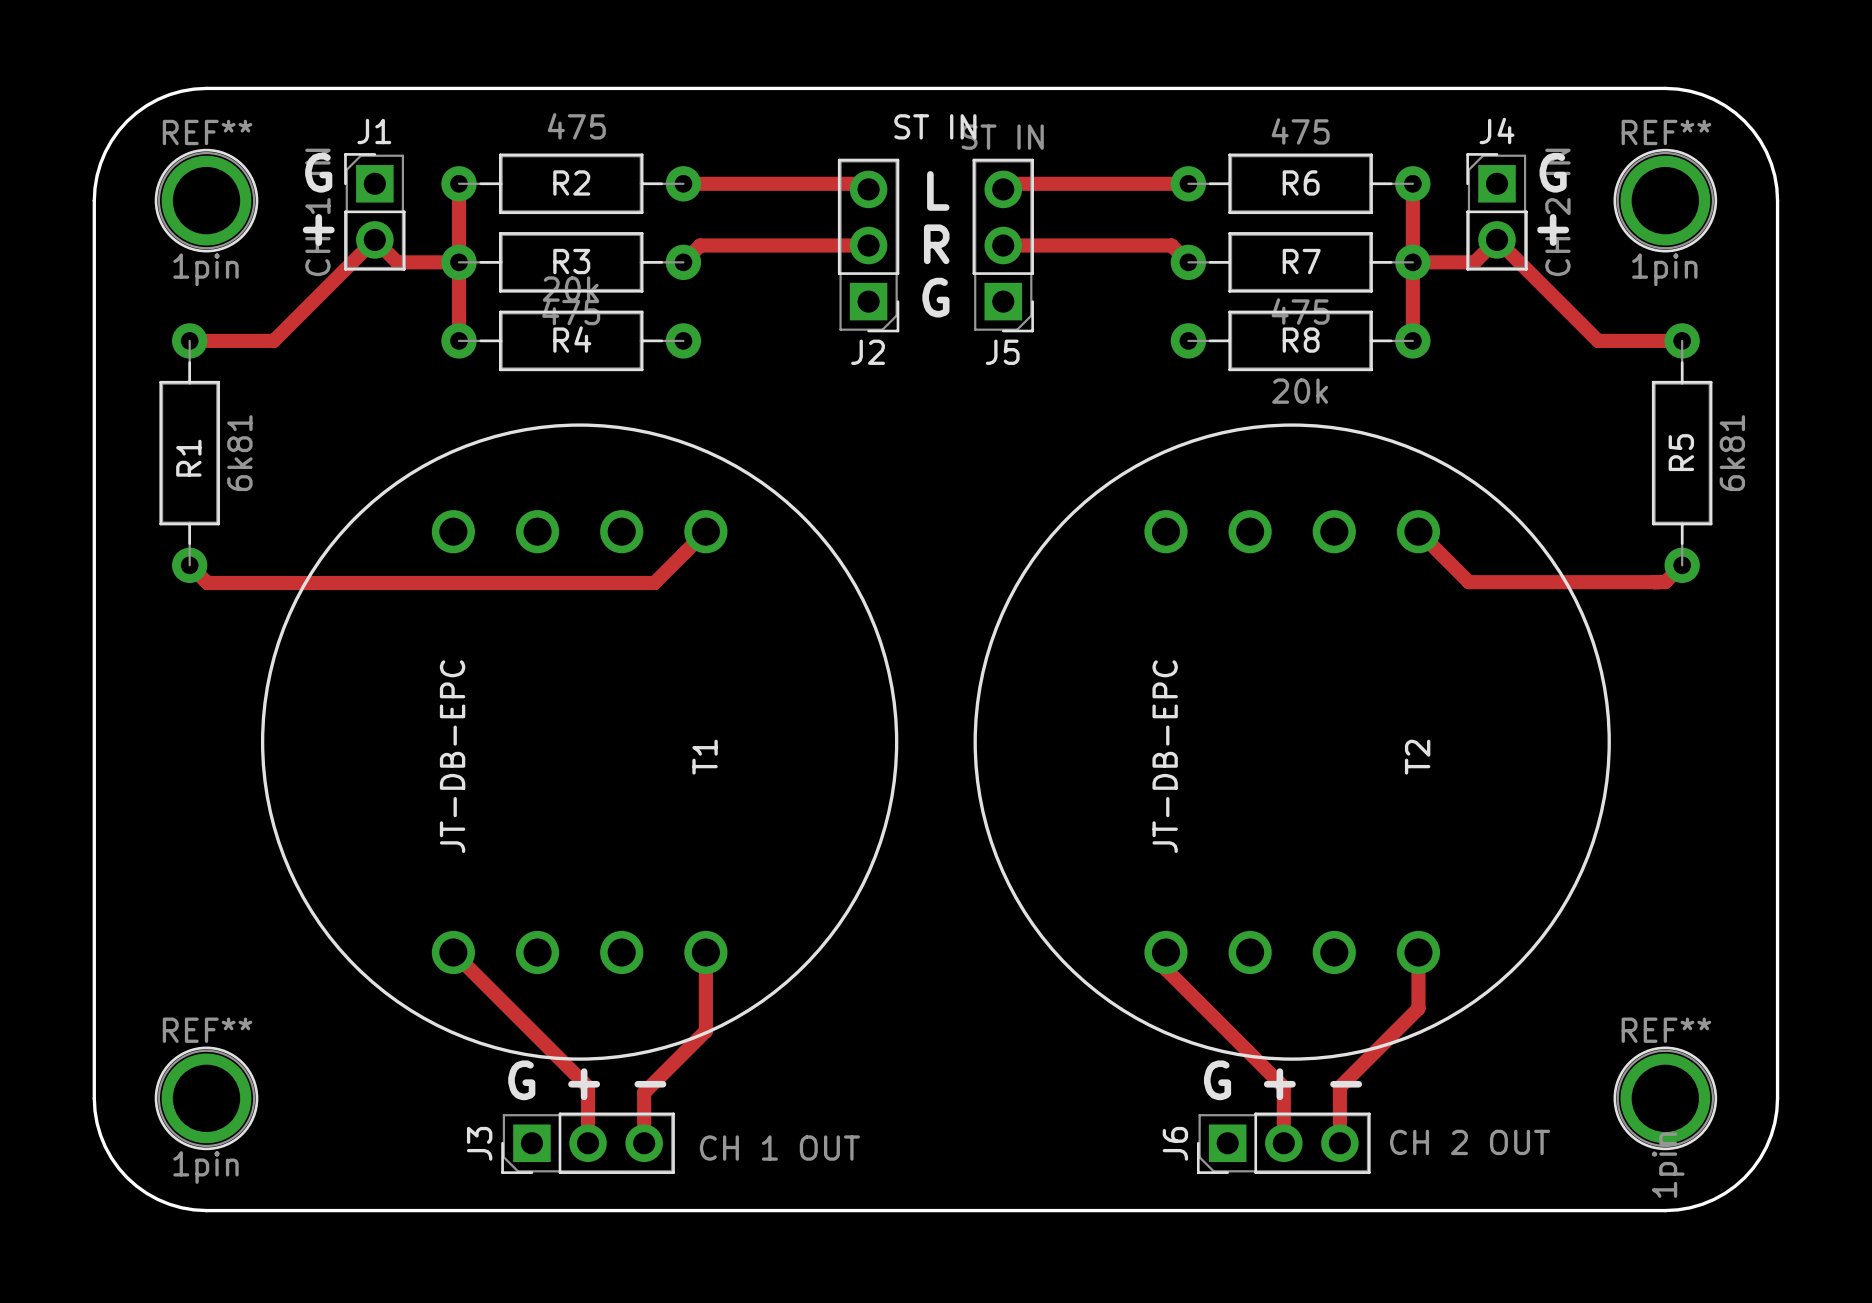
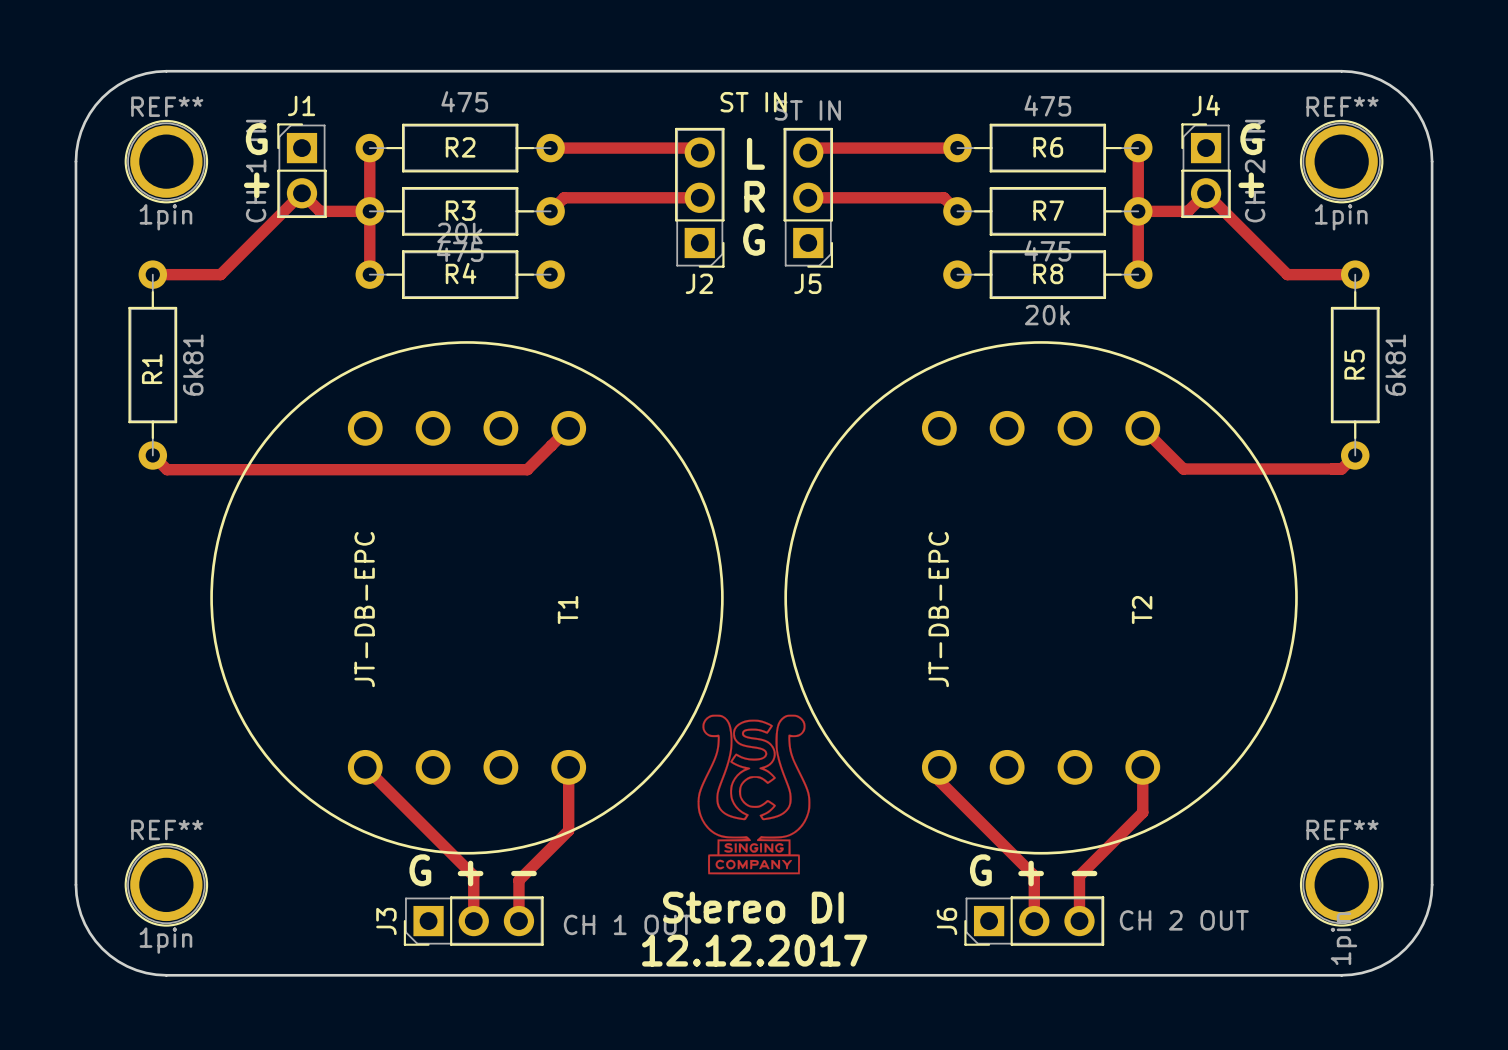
drawing: none -> [697, 714, 811, 875]
text: none -> Stereo DI (753, 907)
text: none -> 12.12.2017 (754, 950)

